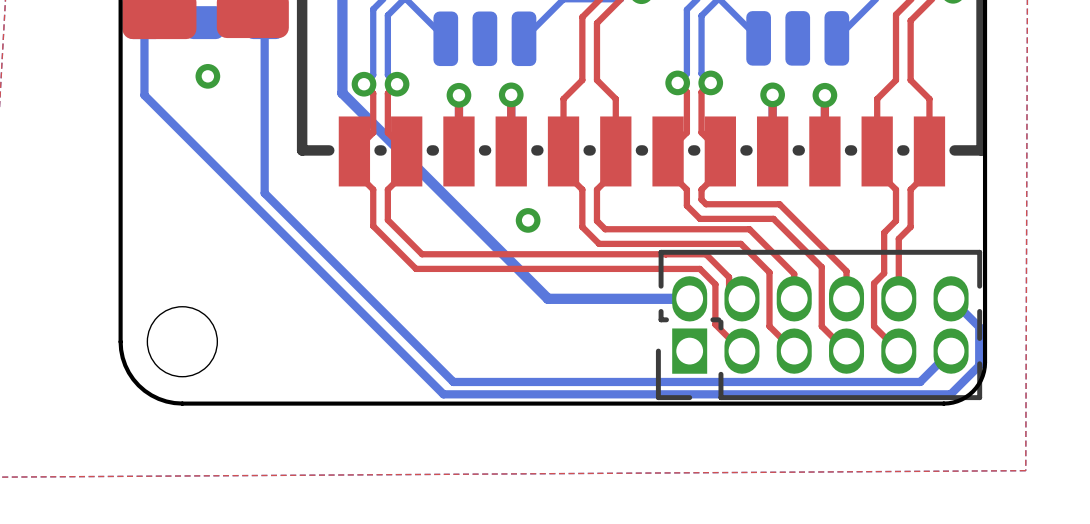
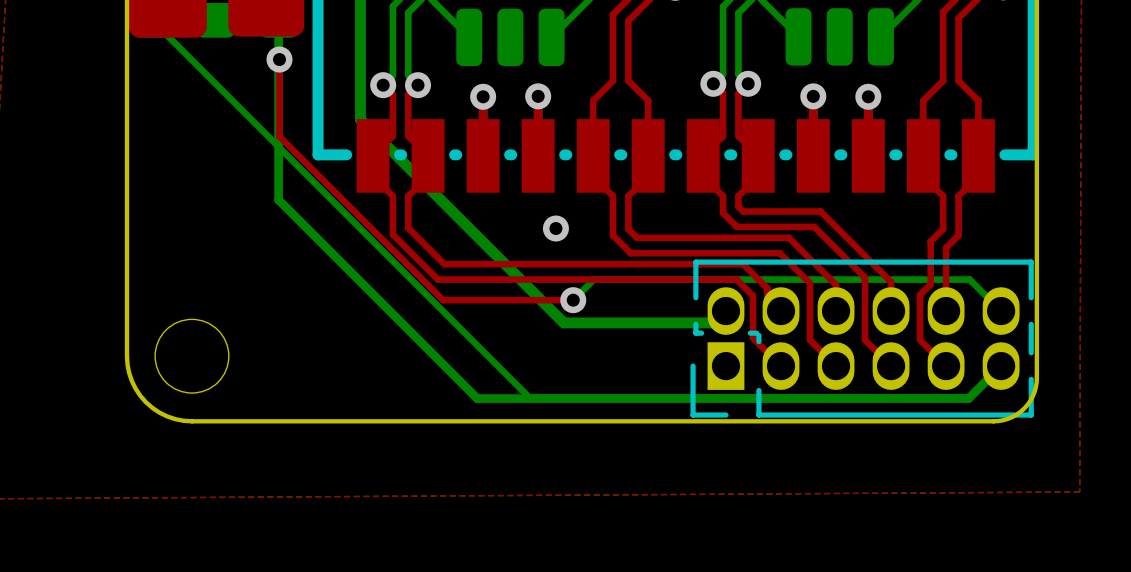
bottom track: (144, 22) (144, 95) (443, 394) (950, 394) (979, 365) (979, 326) (951, 298) -> (152, 20) (529, 397) (969, 397)
top track: none -> (279, 59) (279, 136) (443, 300) (573, 300)
via position: (207, 76) -> (279, 59)
bottom track: (342, 93) (548, 298) (689, 298) -> (360, 94) (360, 119) (563, 322) (714, 322) (725, 311)
bottom track: none -> (573, 300) (593, 279) (969, 279) (1001, 311)
via: none -> (573, 300)

